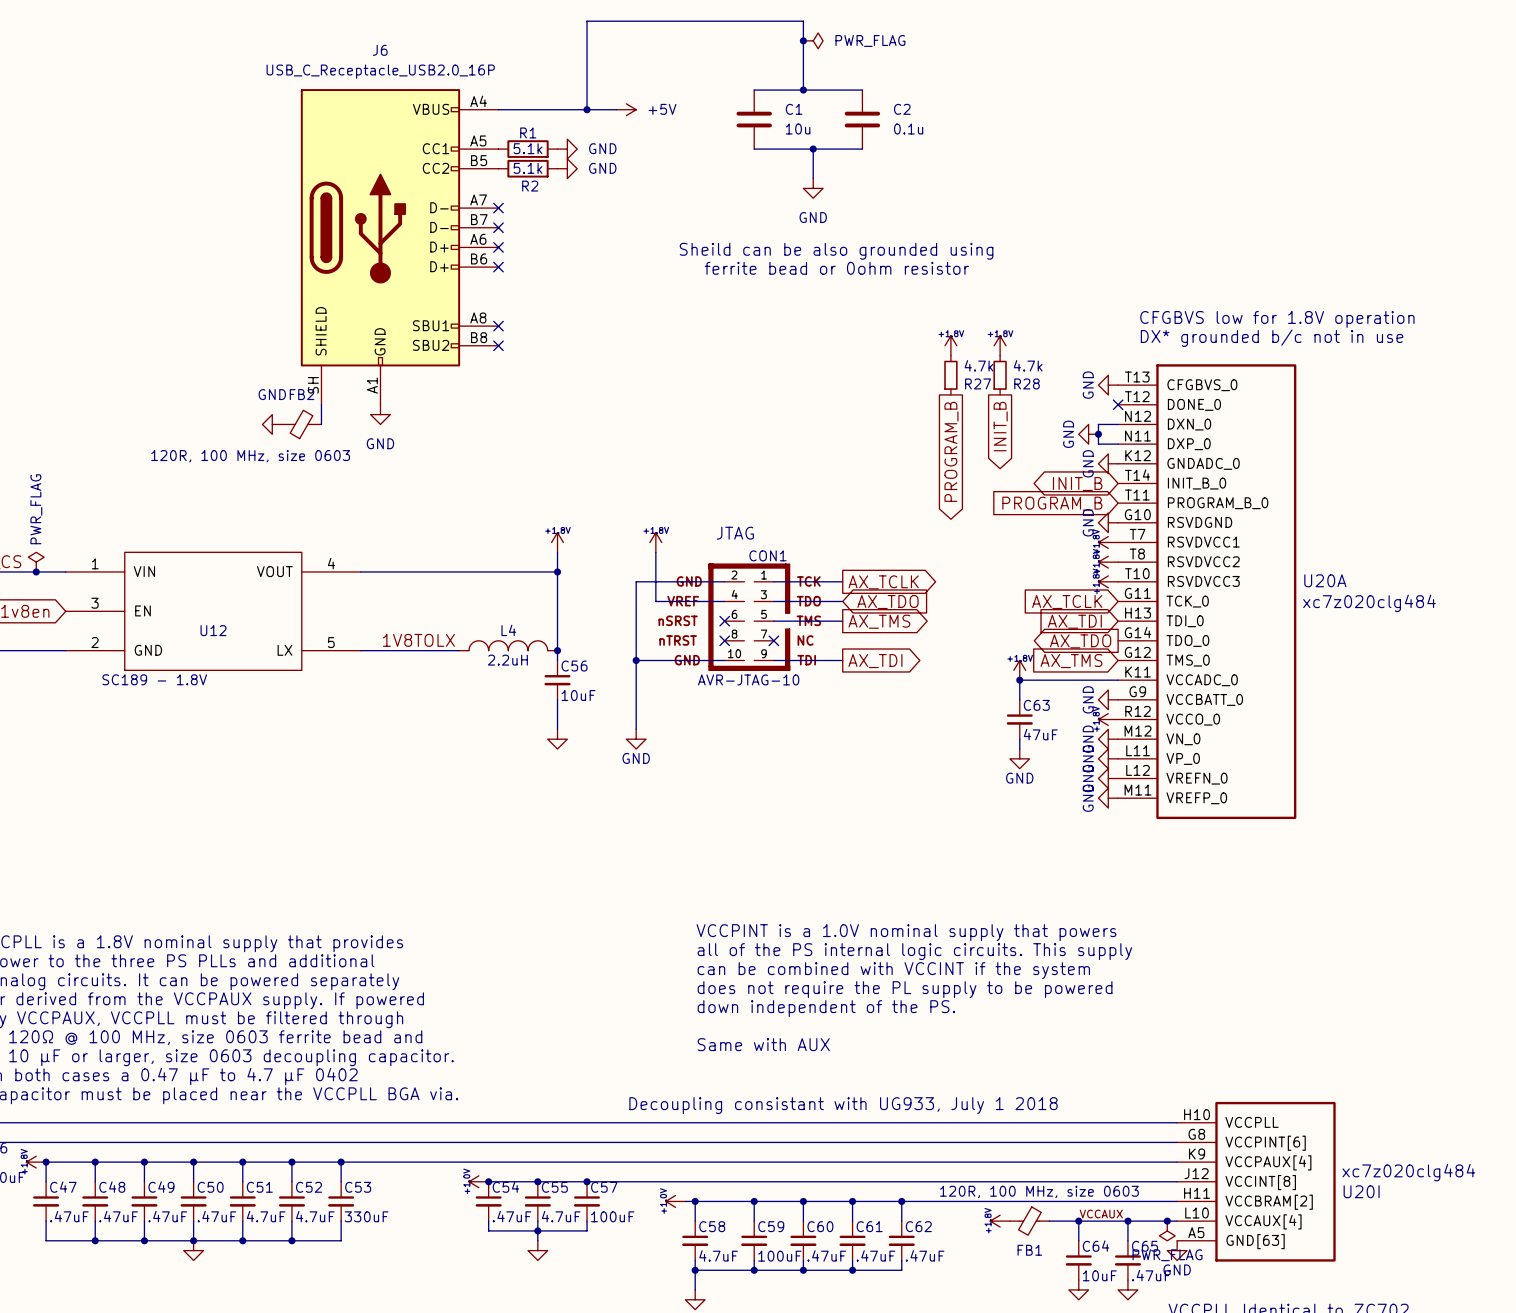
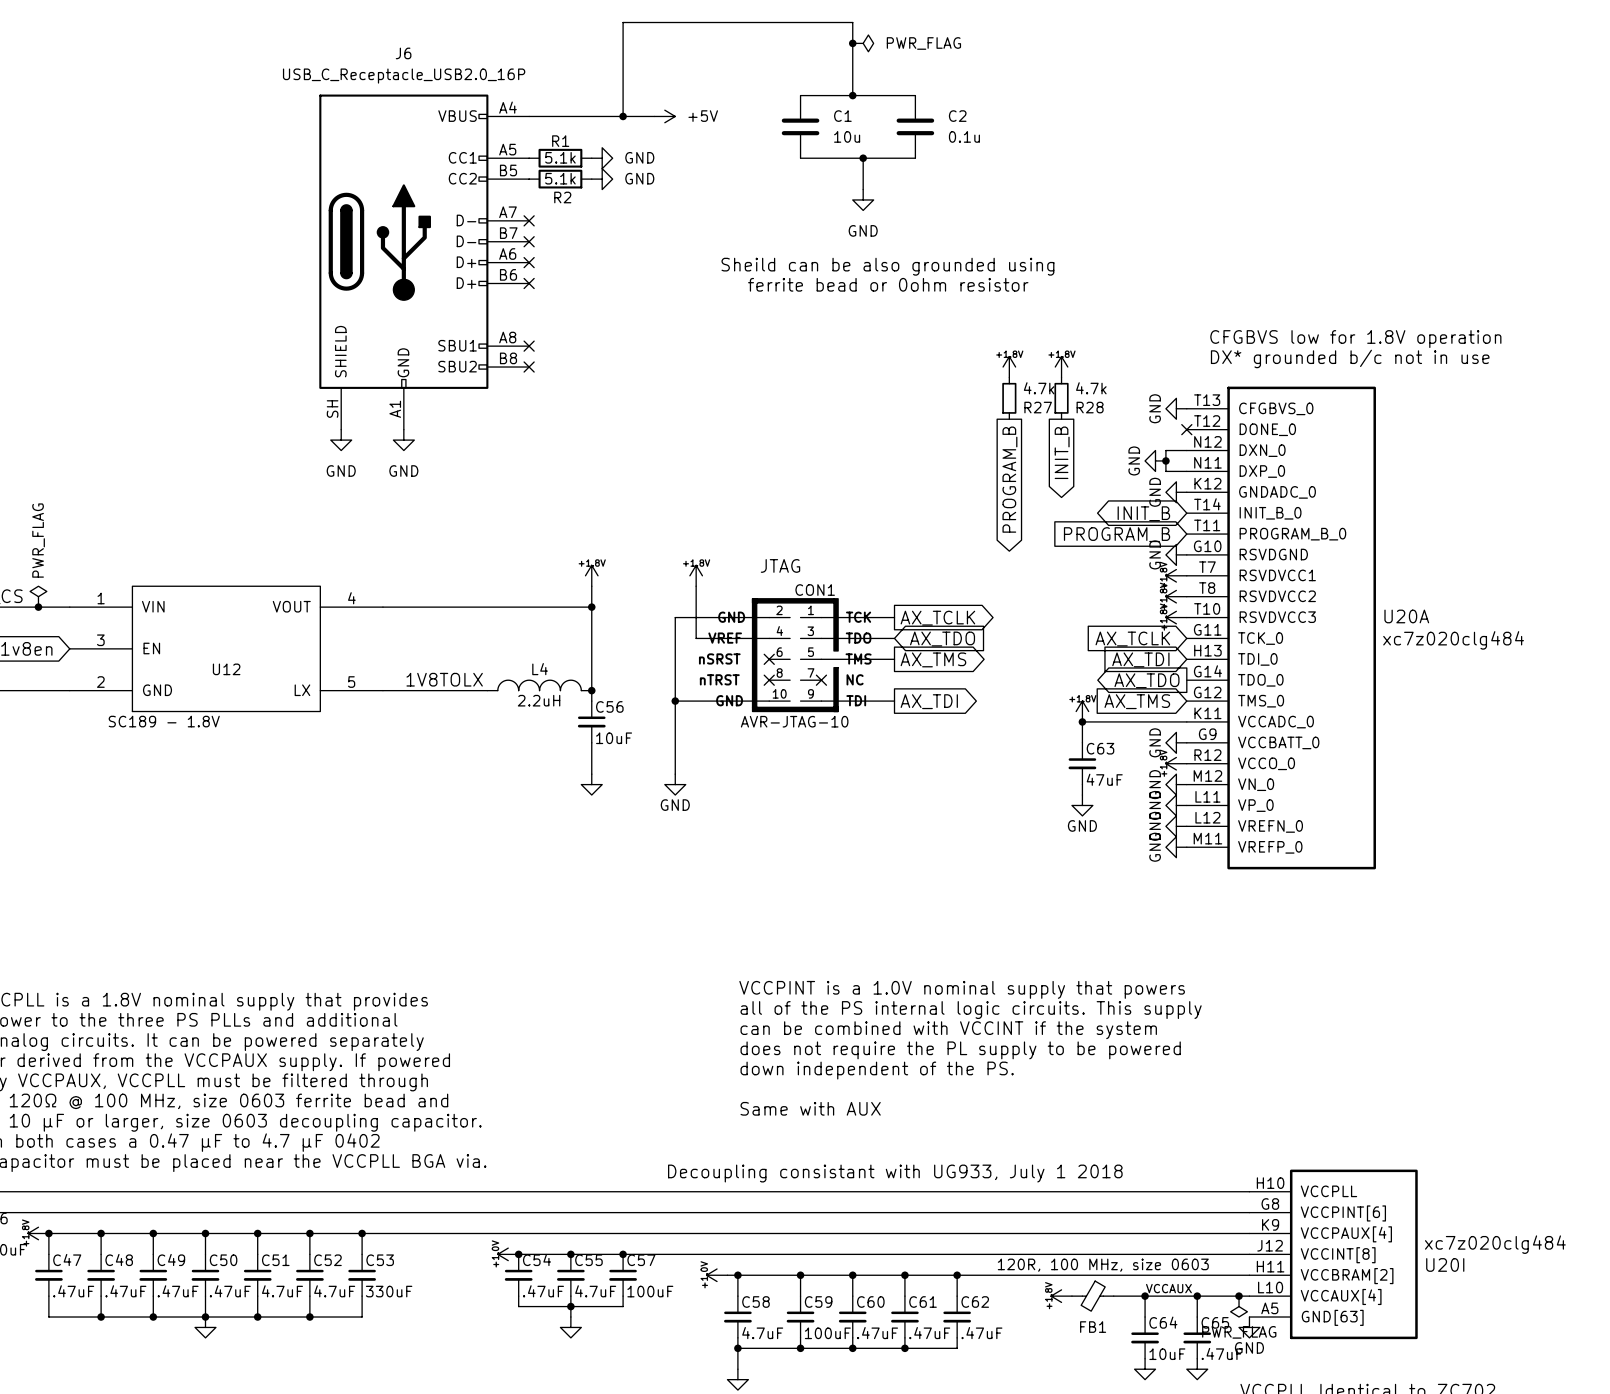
power symbol text position: GND (272, 394) -> GND (341, 471)
power symbol rotation: 0° (272, 424) -> 90° counterclockwise (341, 440)
power symbol position: GND (272, 424) -> GND (341, 440)
FB2: 120R, 100 MHz, size 0603 (301, 424) -> none

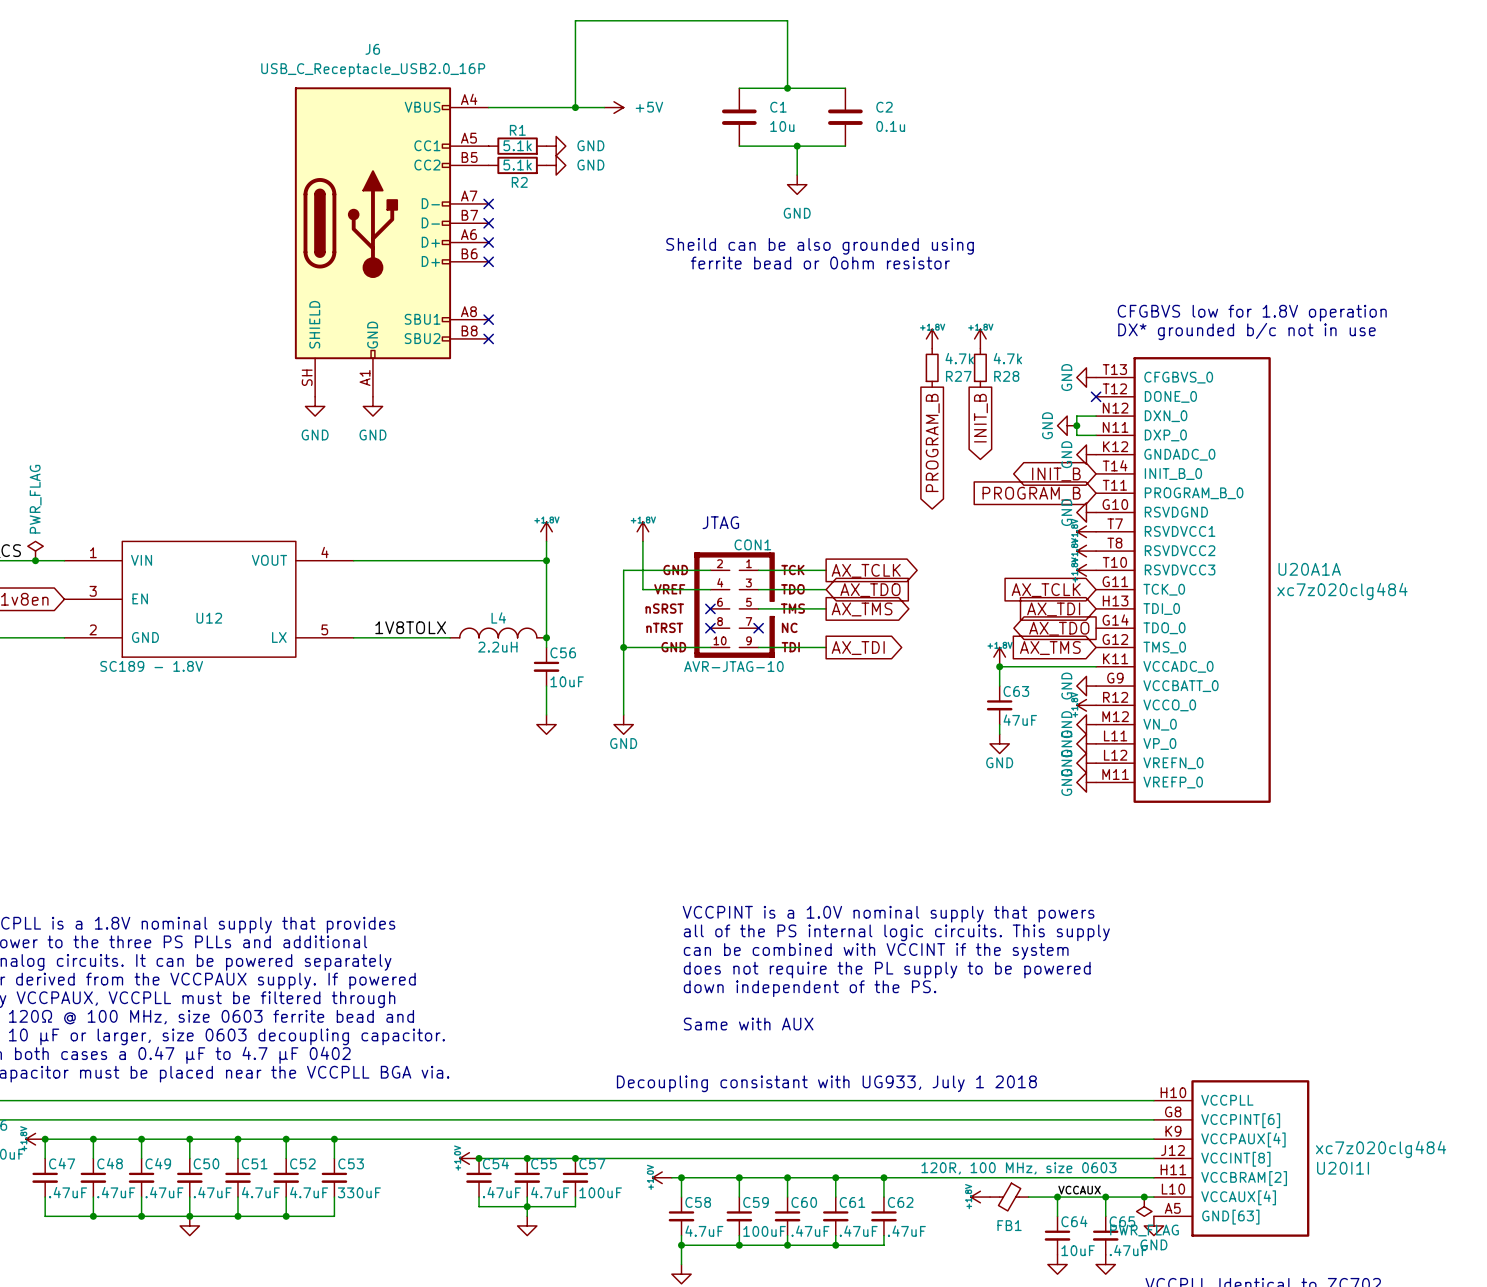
junction: (852, 43) -> none
power symbol: PWR_FLAG (863, 43) -> none
U20A name: U20A (1406, 616) -> U20A1A (1309, 569)
U20I name: U20I (1445, 1264) -> U20I1I (1343, 1168)

